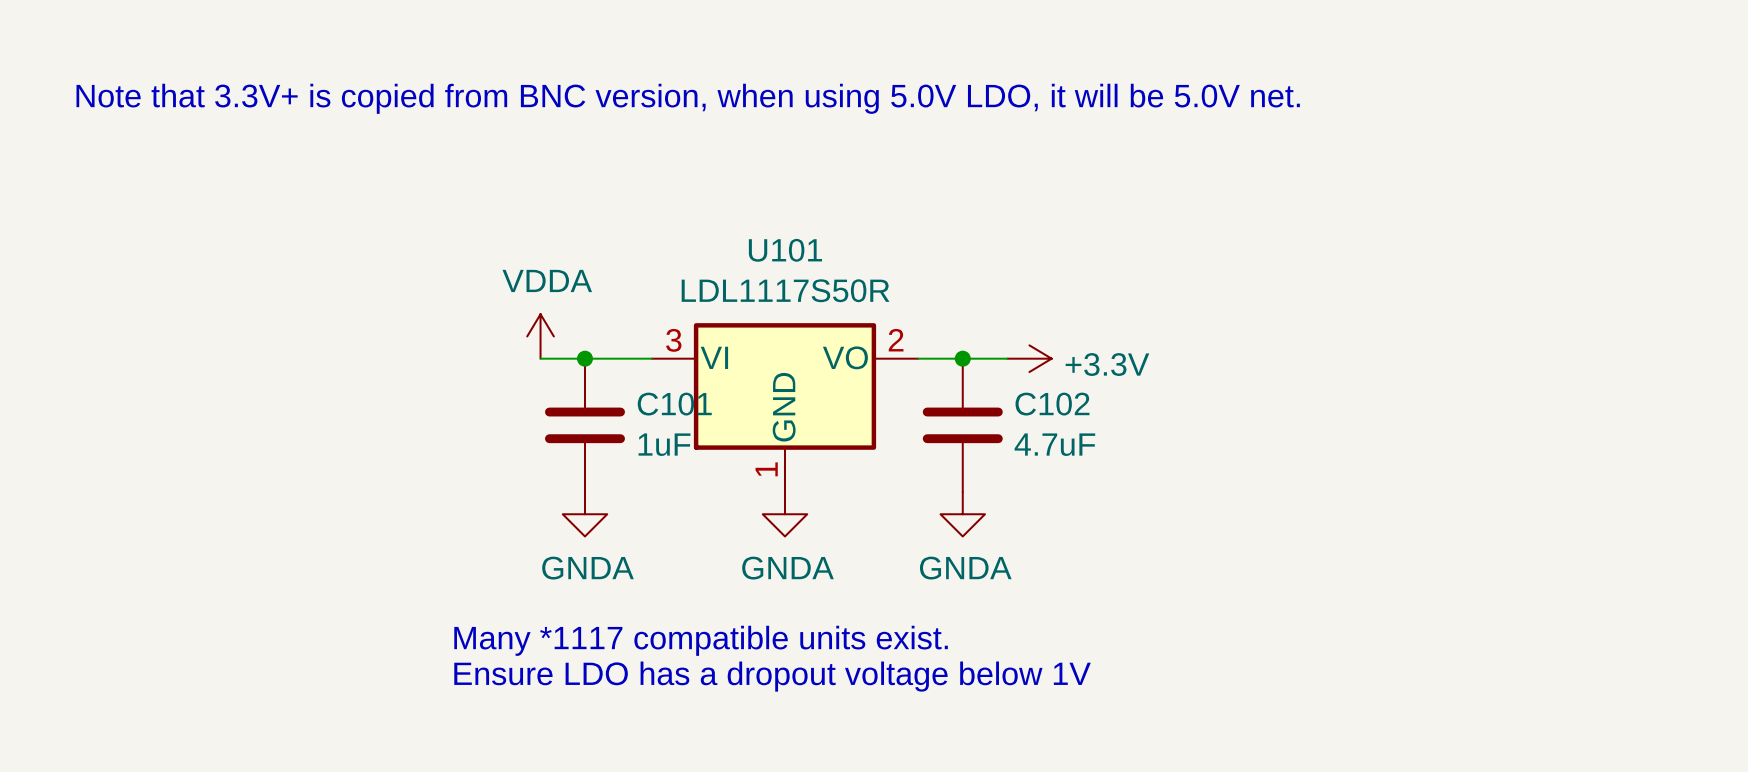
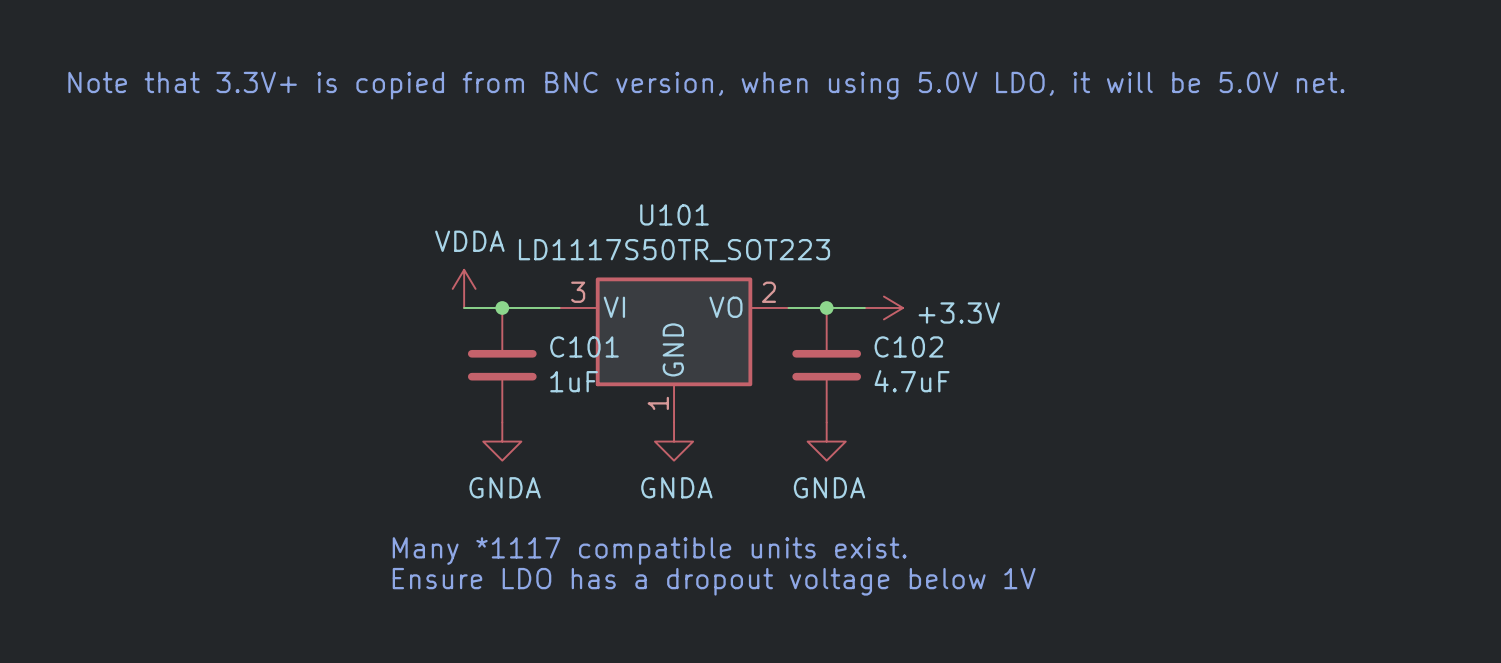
U101 value: LDL1117S50R (785, 290) -> LD1117S50TR_SOT223 (674, 250)

